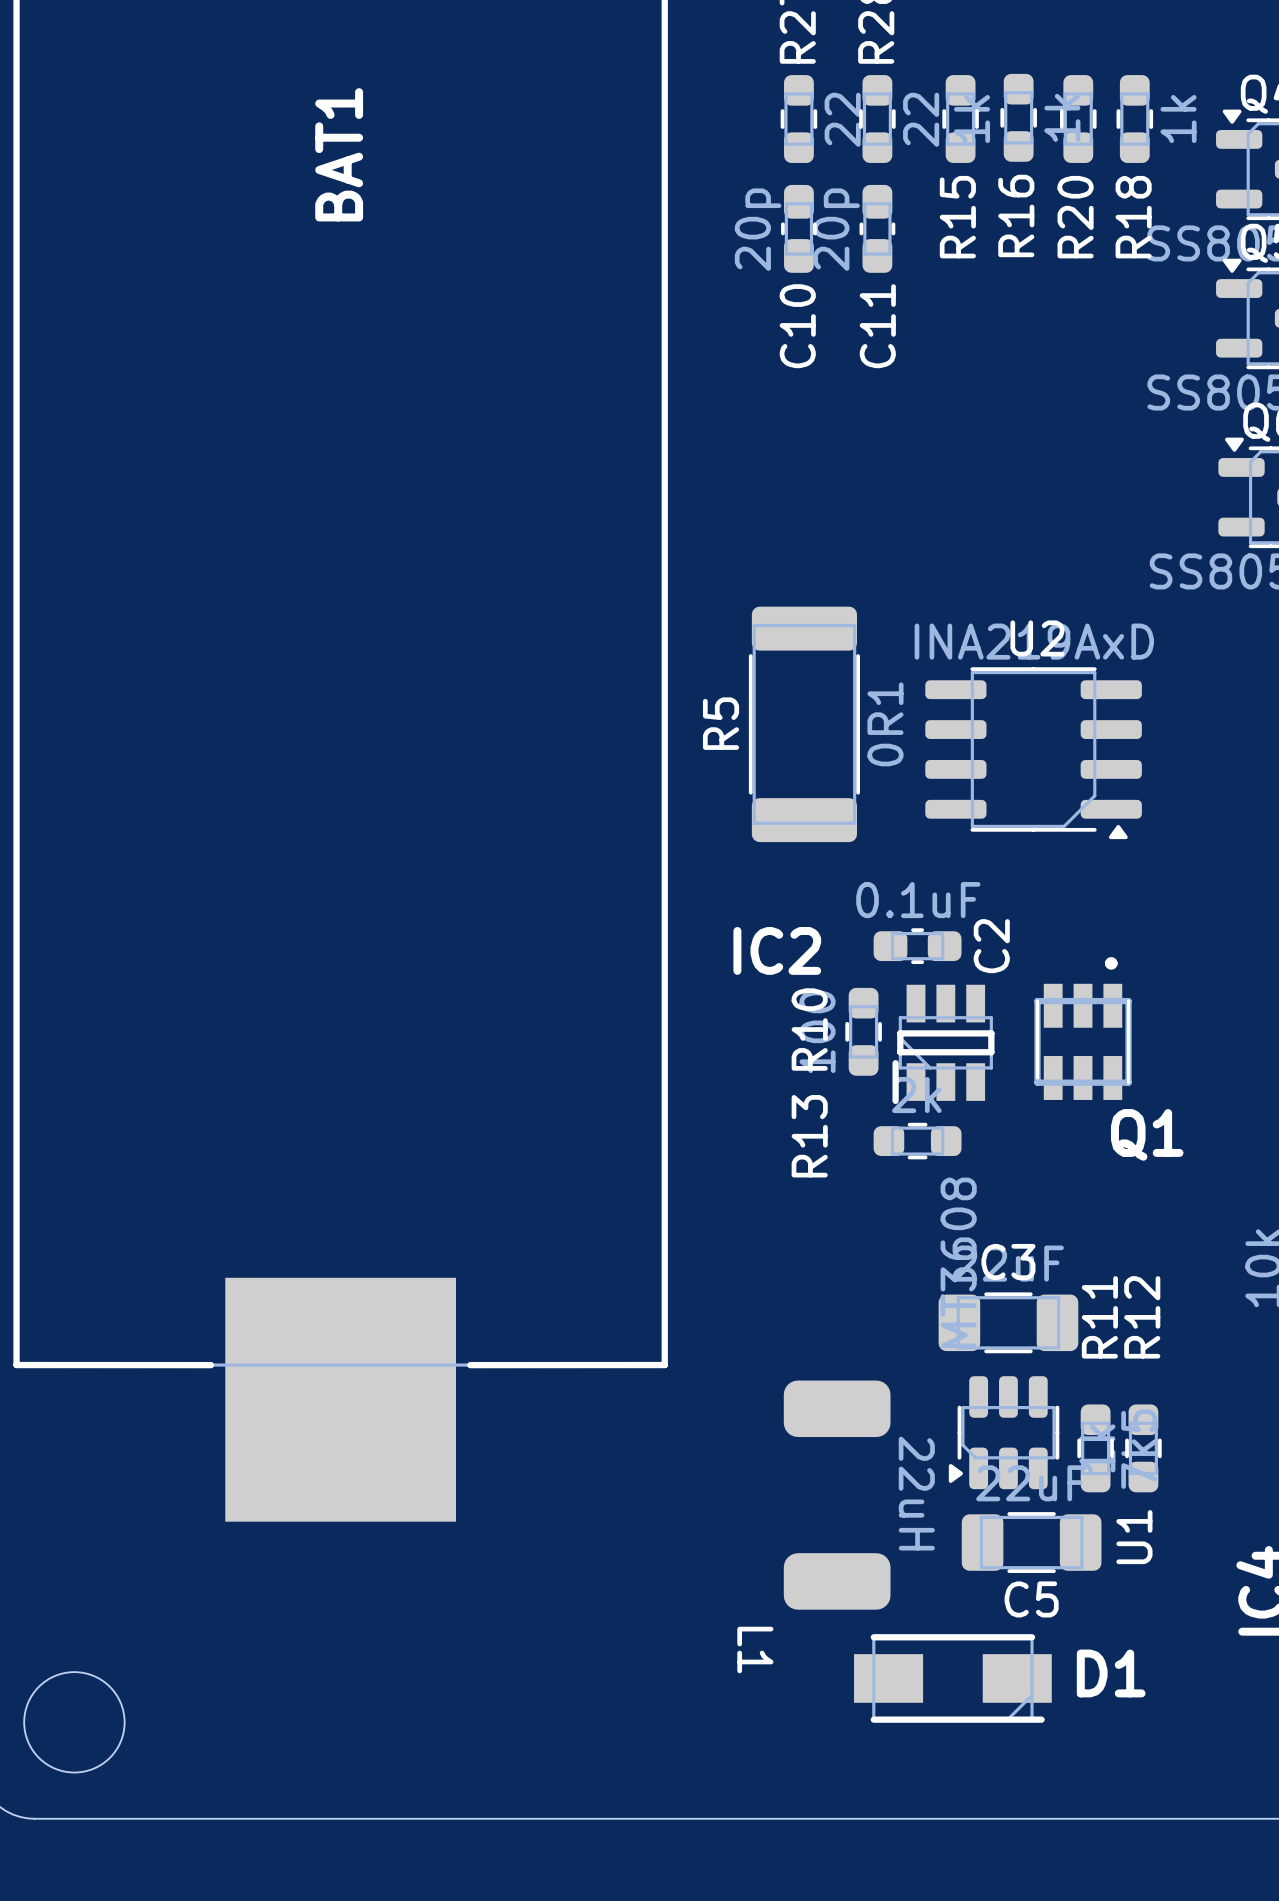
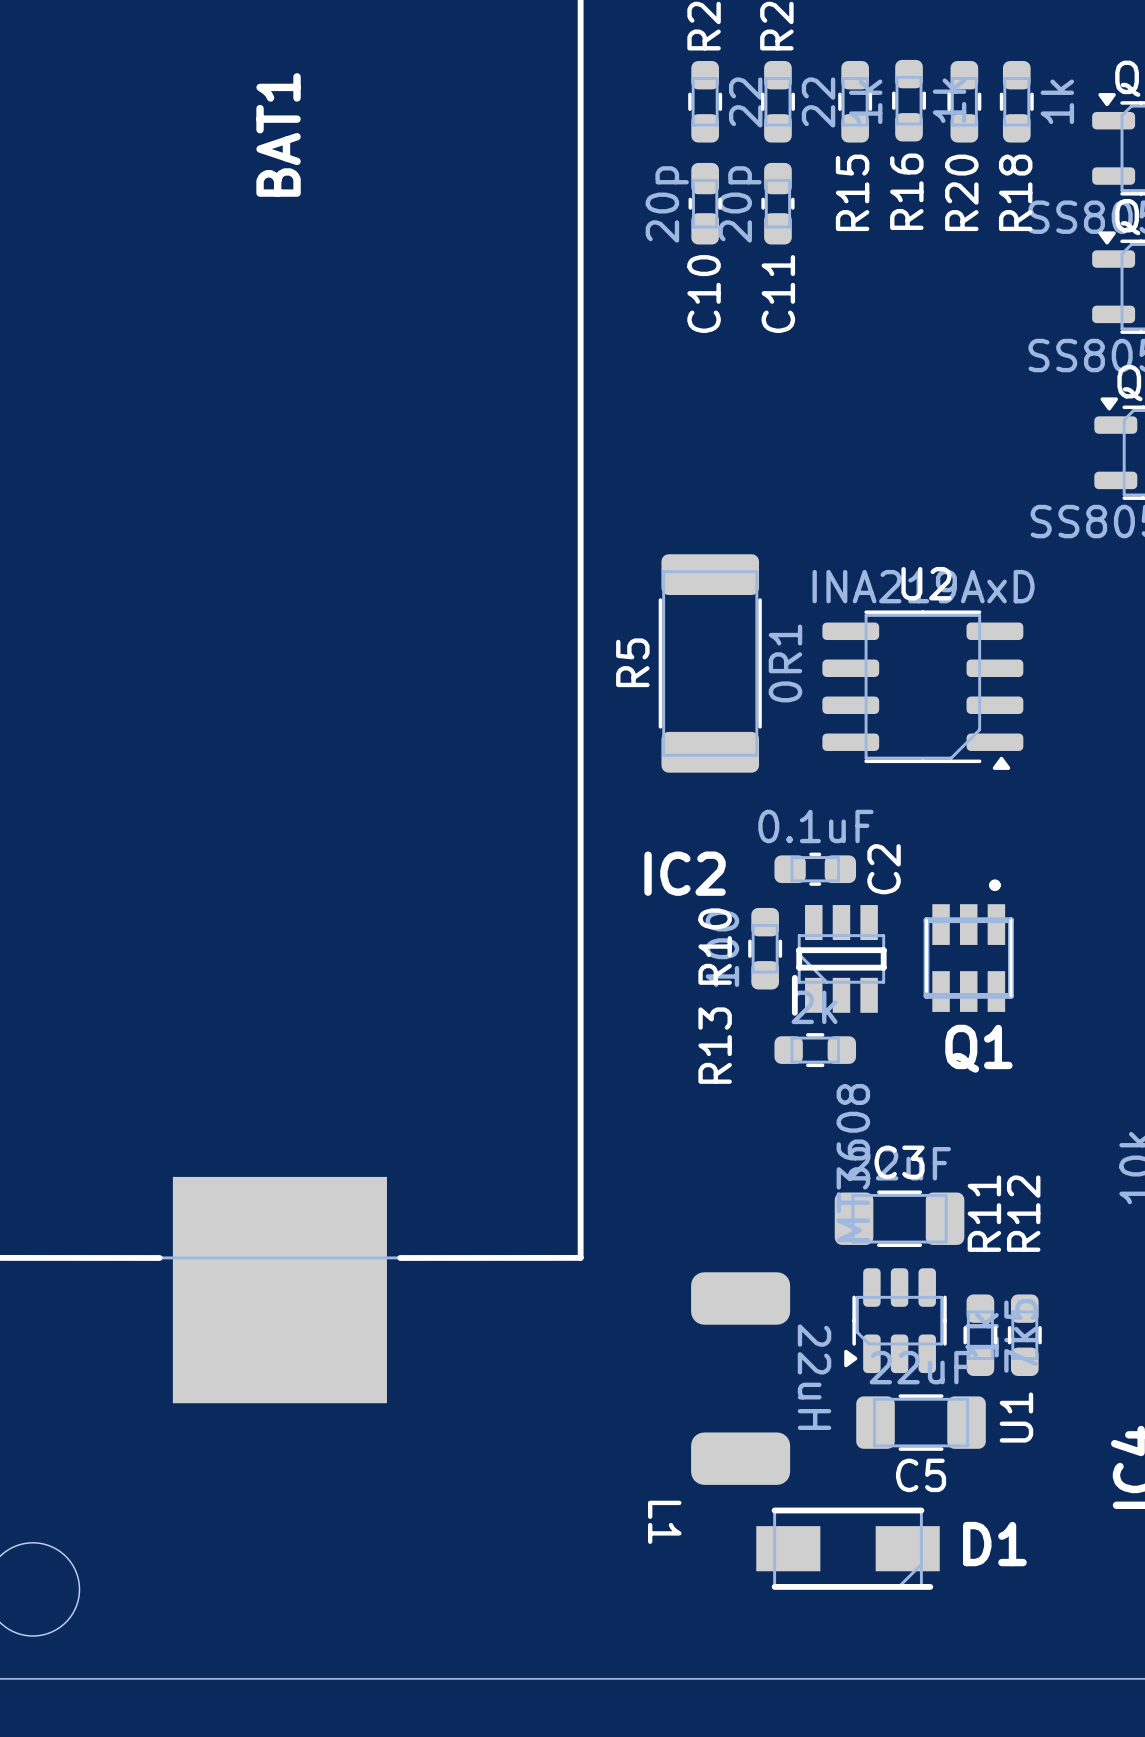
Q1 name position: Q1 (1147, 1134) -> Q1 (978, 1048)

